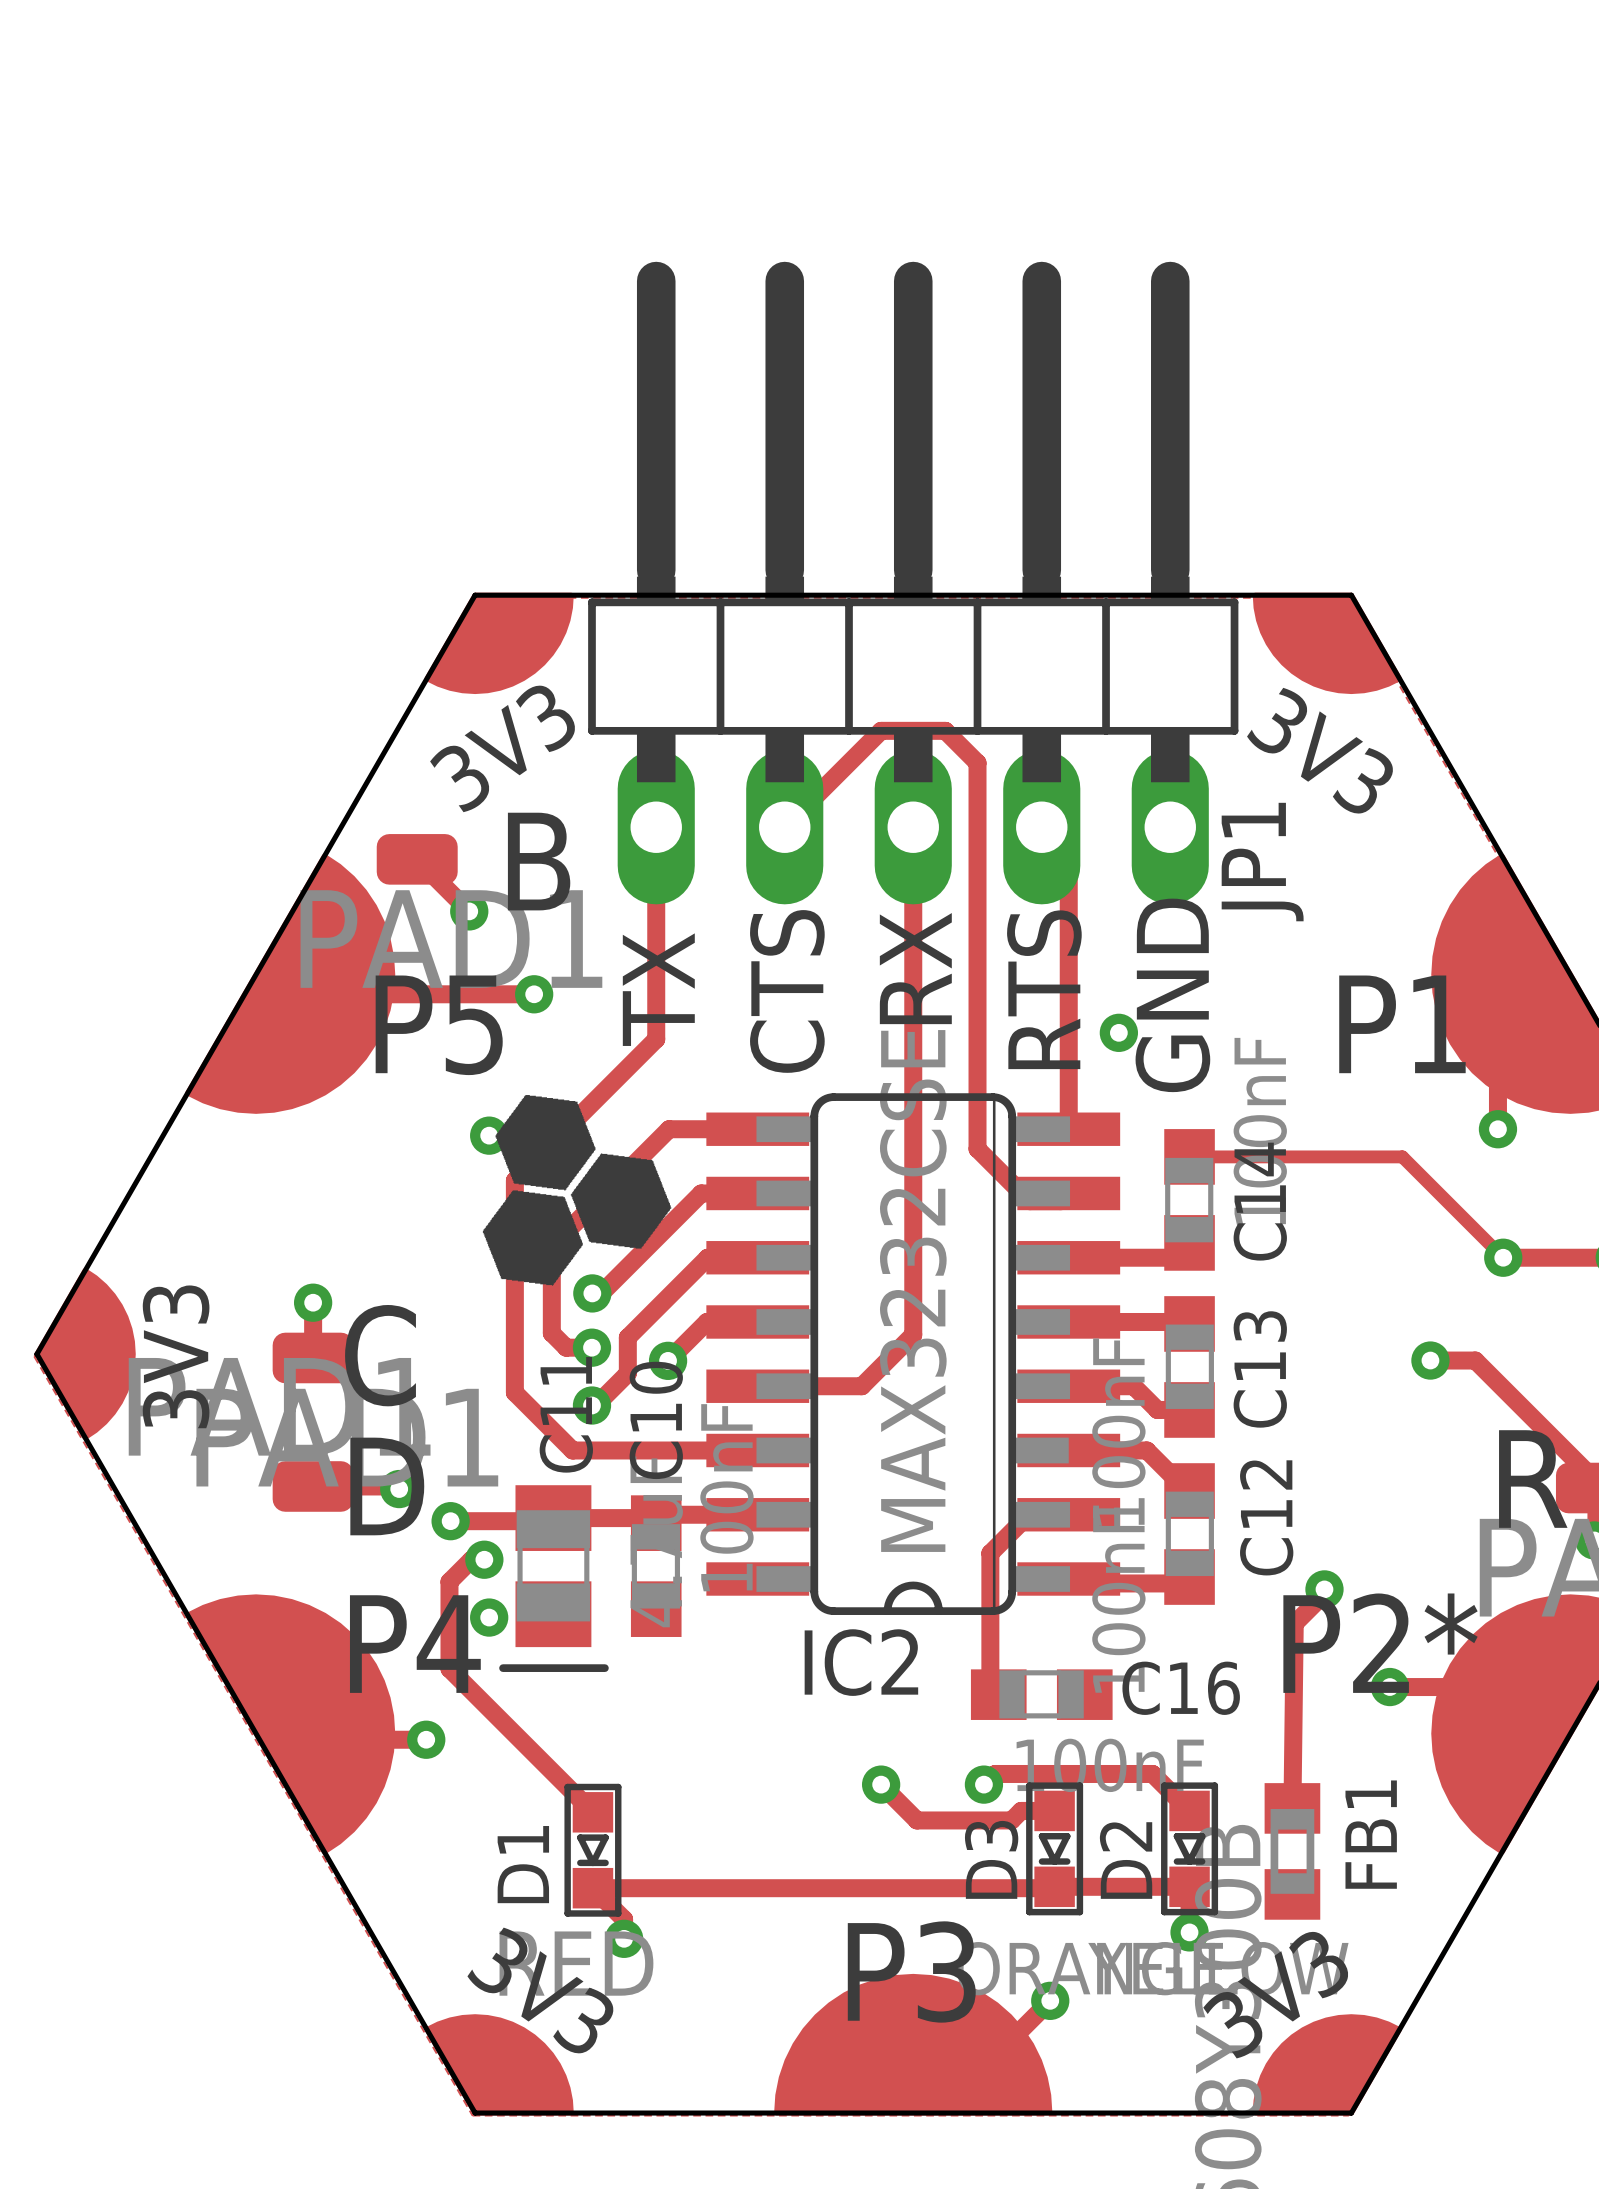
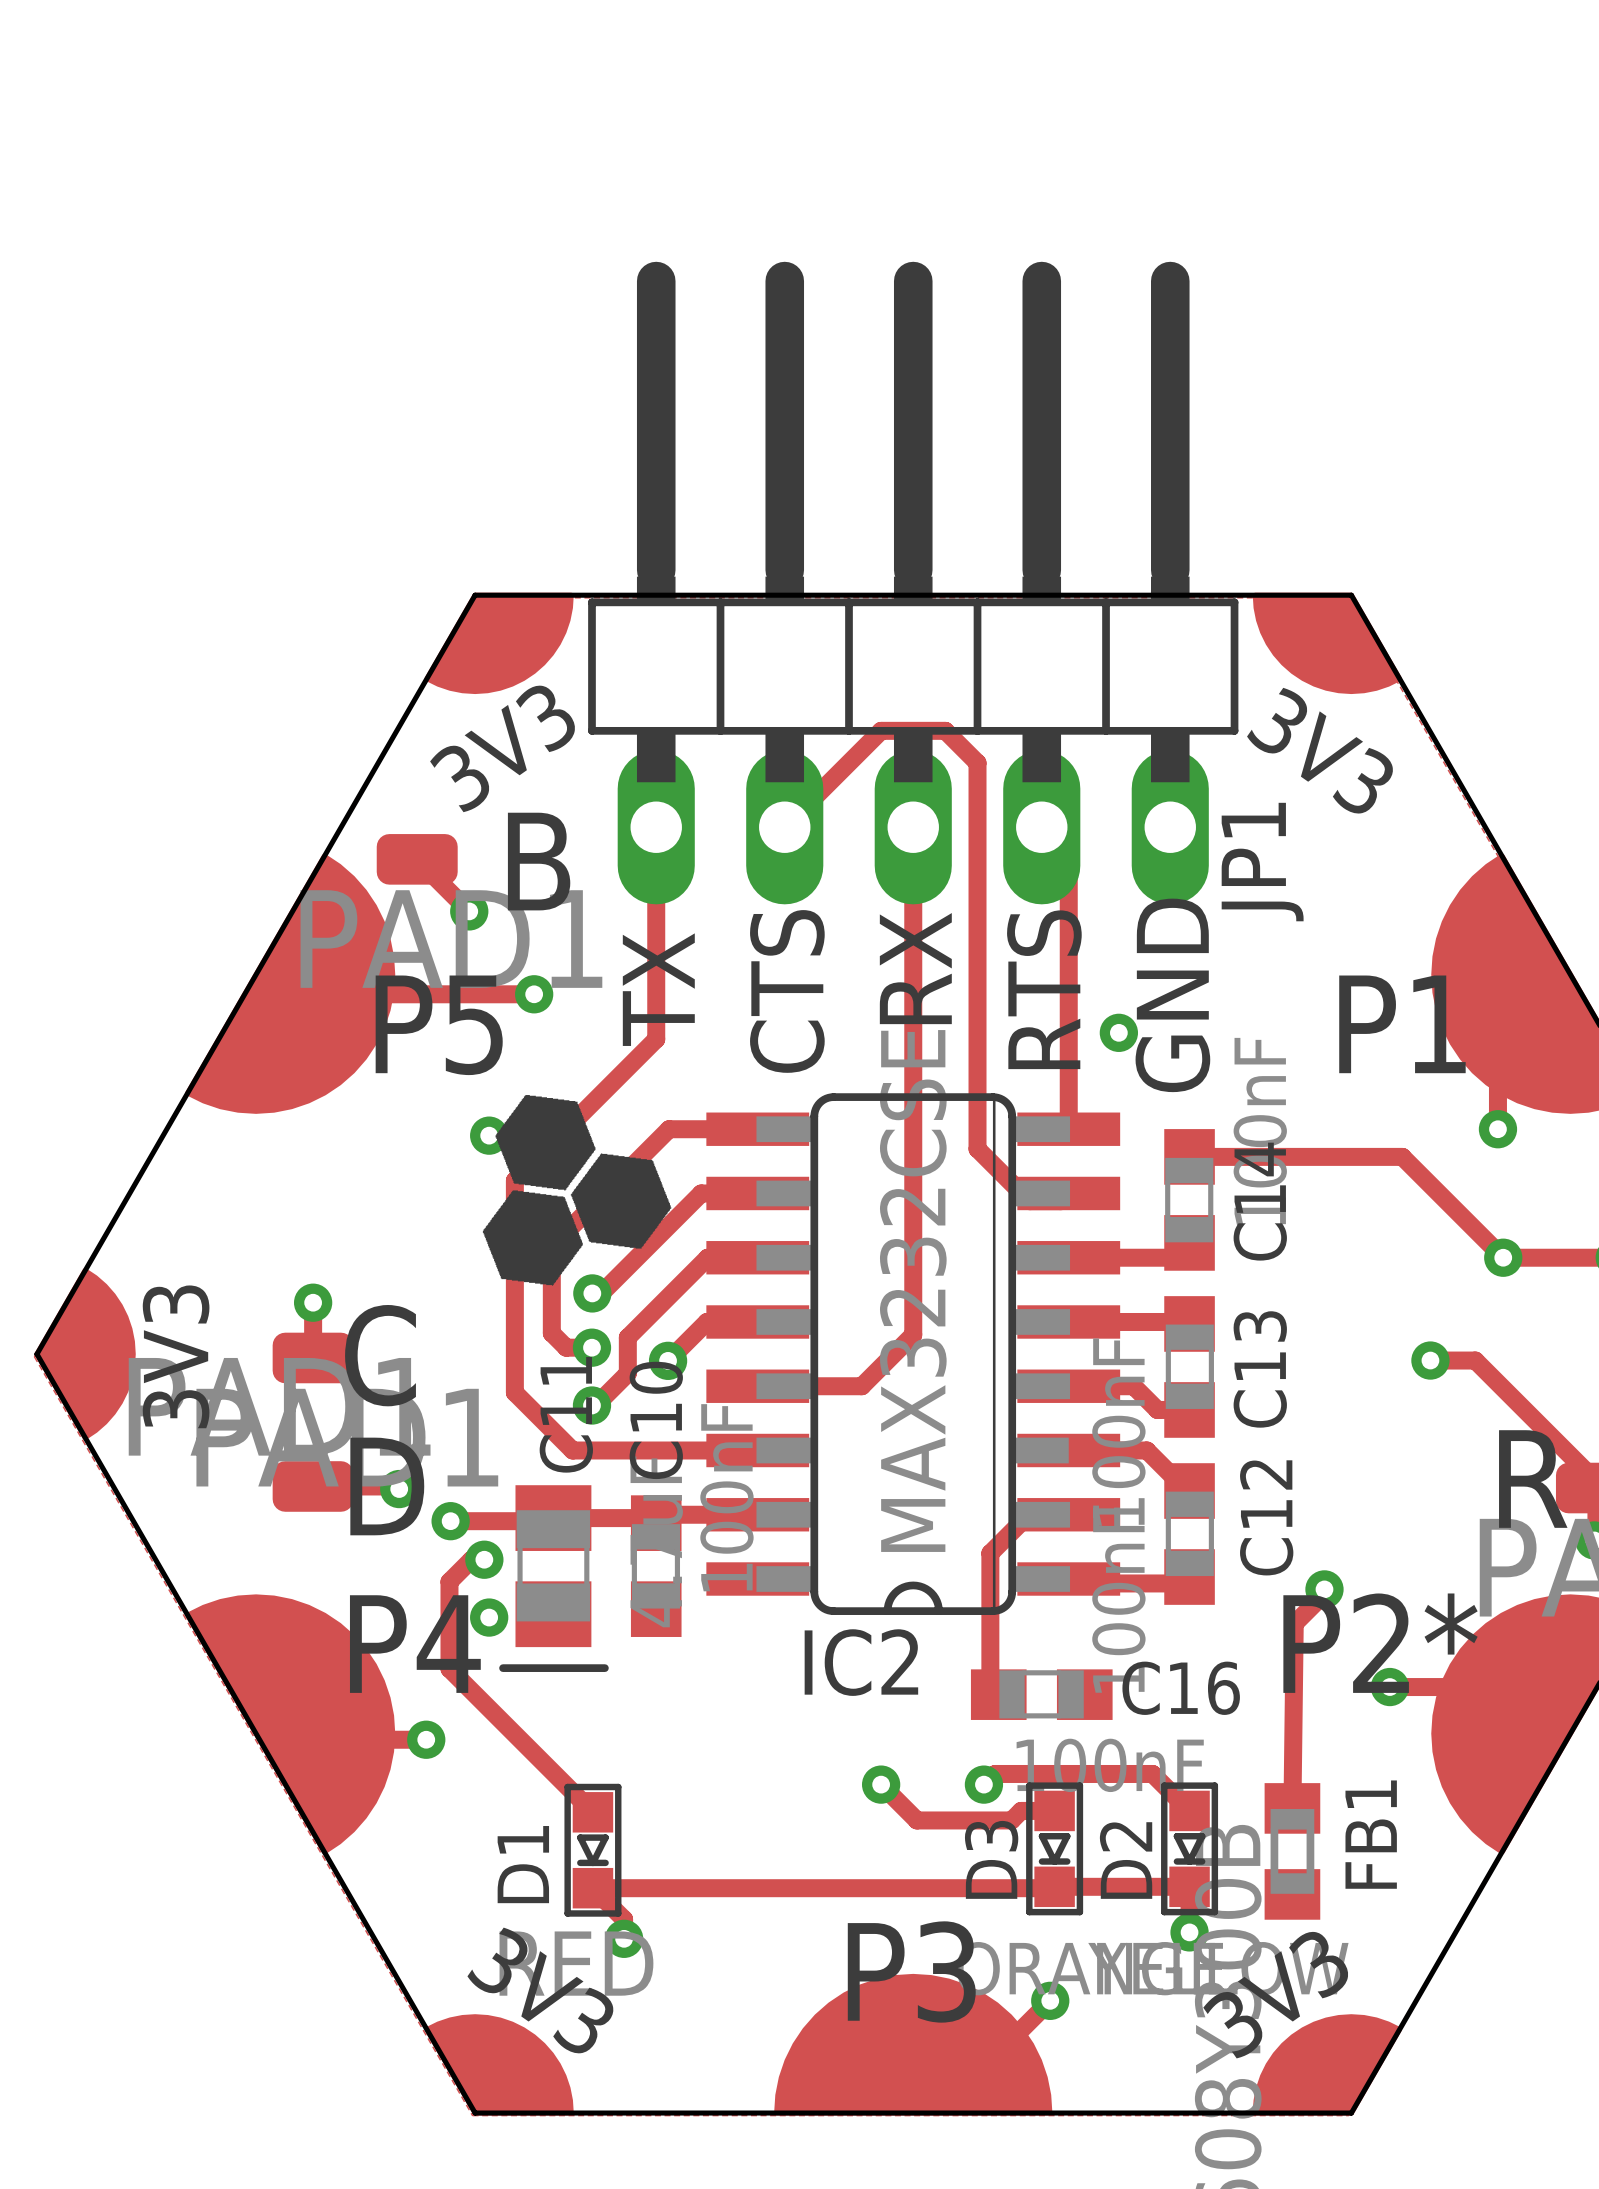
track width: thin (1189, 1156) (1402, 1156) (1503, 1257) -> thick (1189, 1156) (1402, 1156) (1503, 1257)

